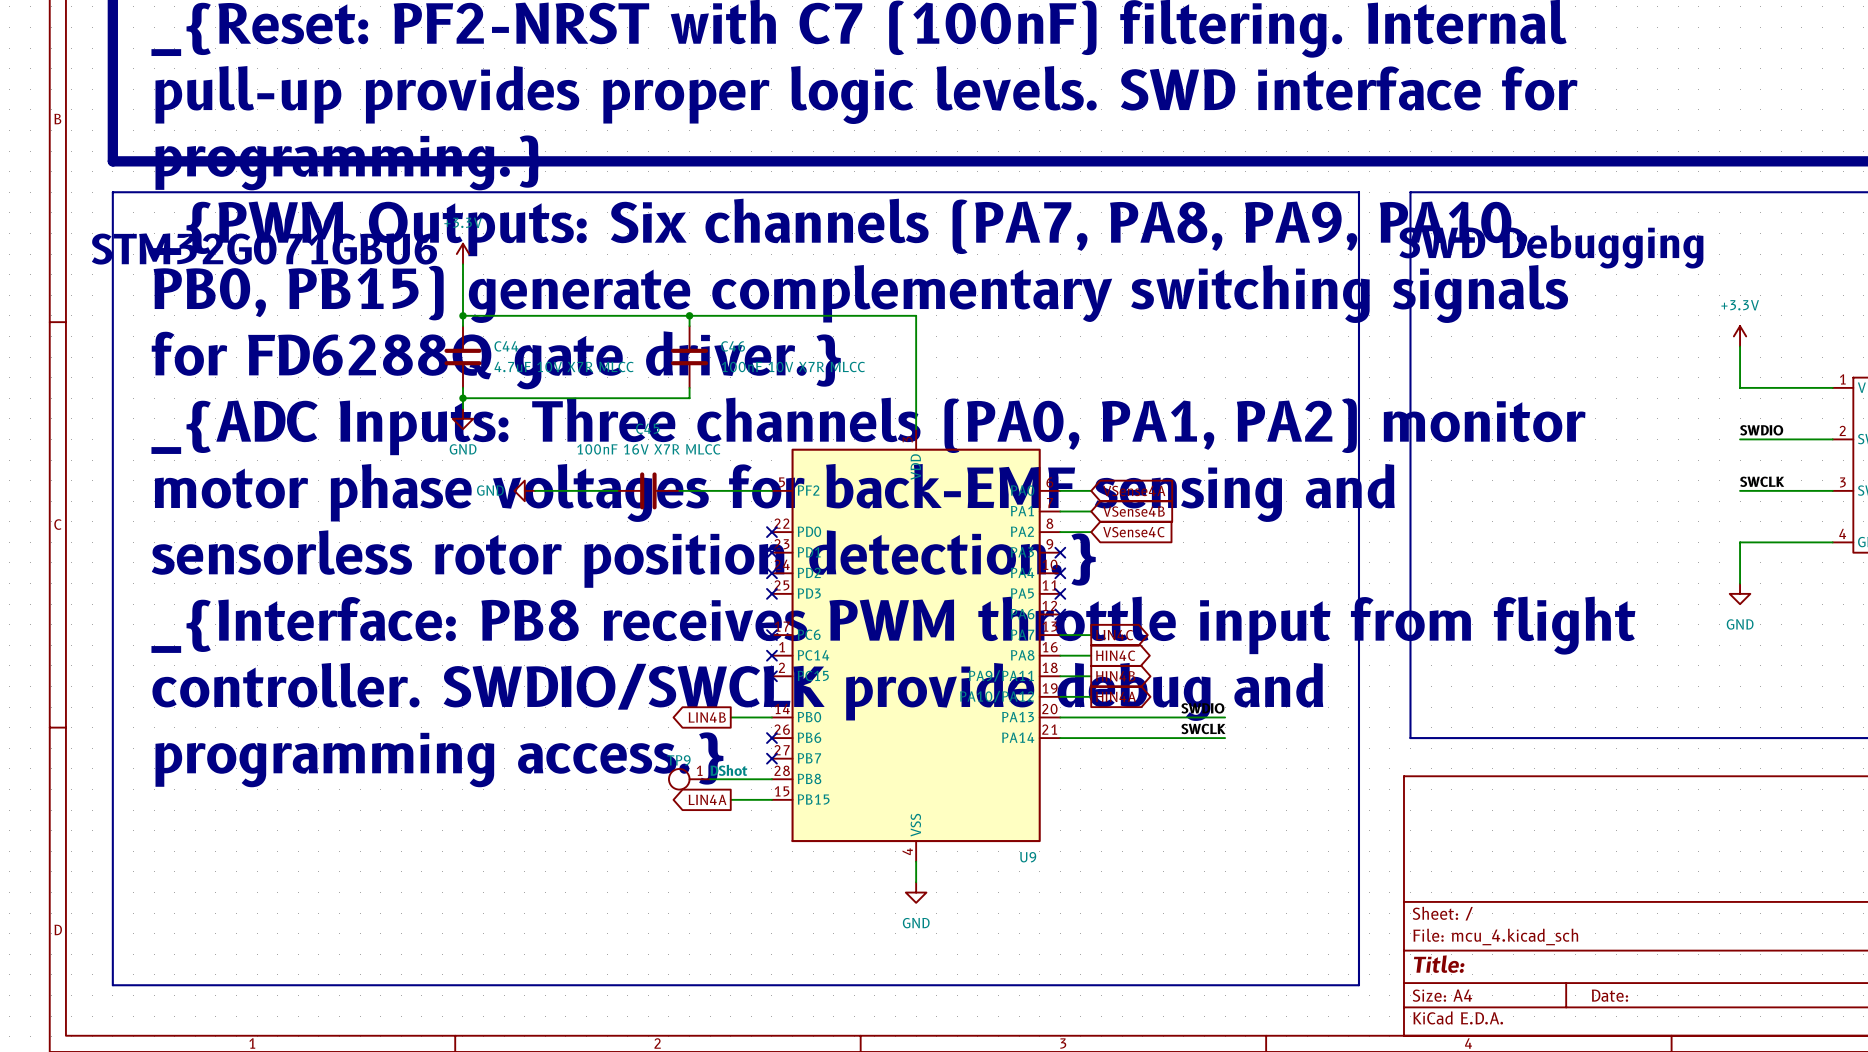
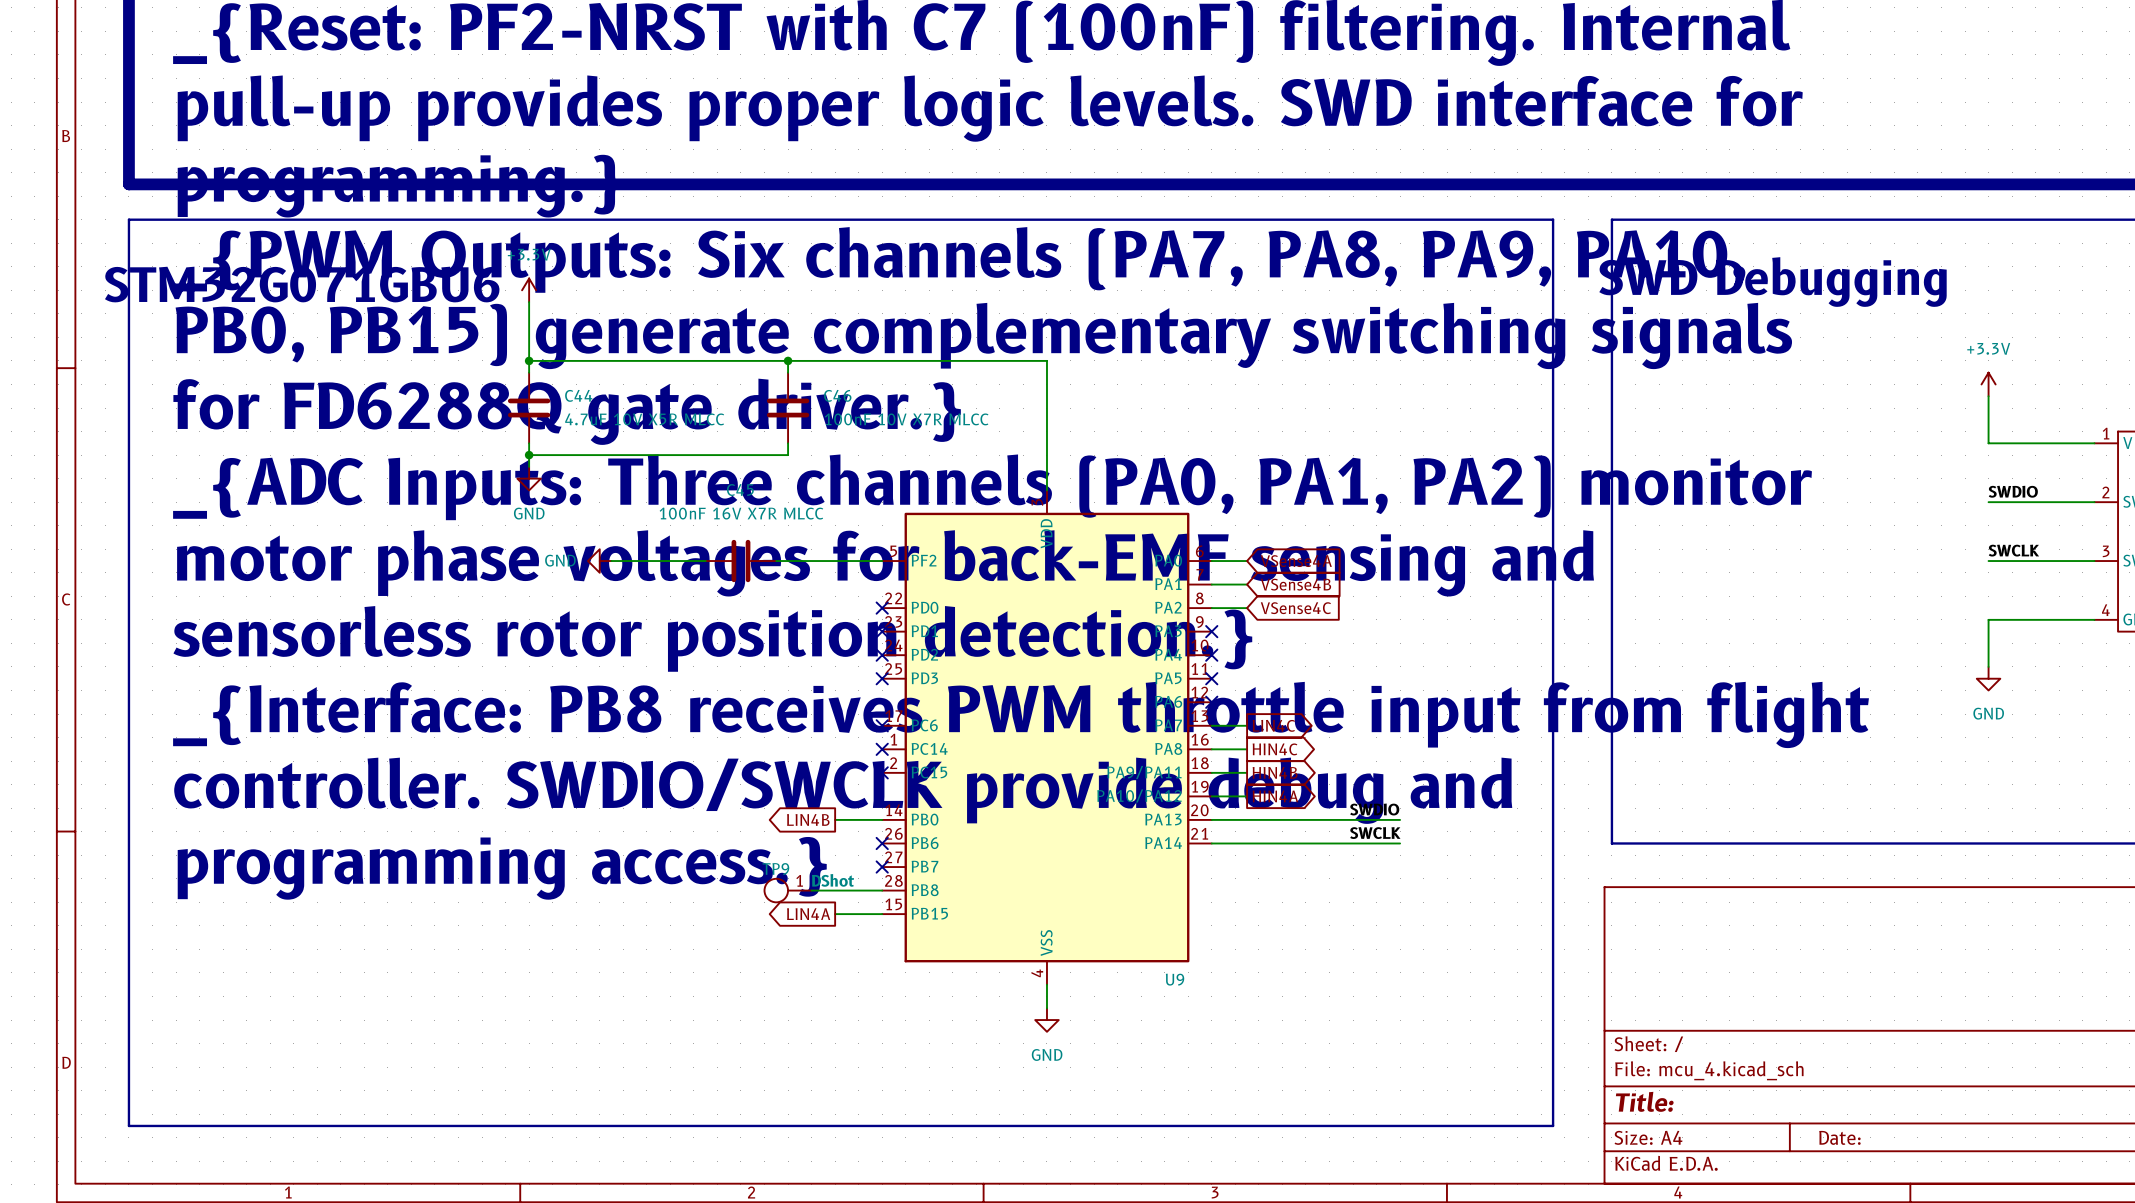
C44 value: 4.7uF 10V X7R MLCC (564, 367) -> 4.7uF 10V X5R MLCC (644, 419)

